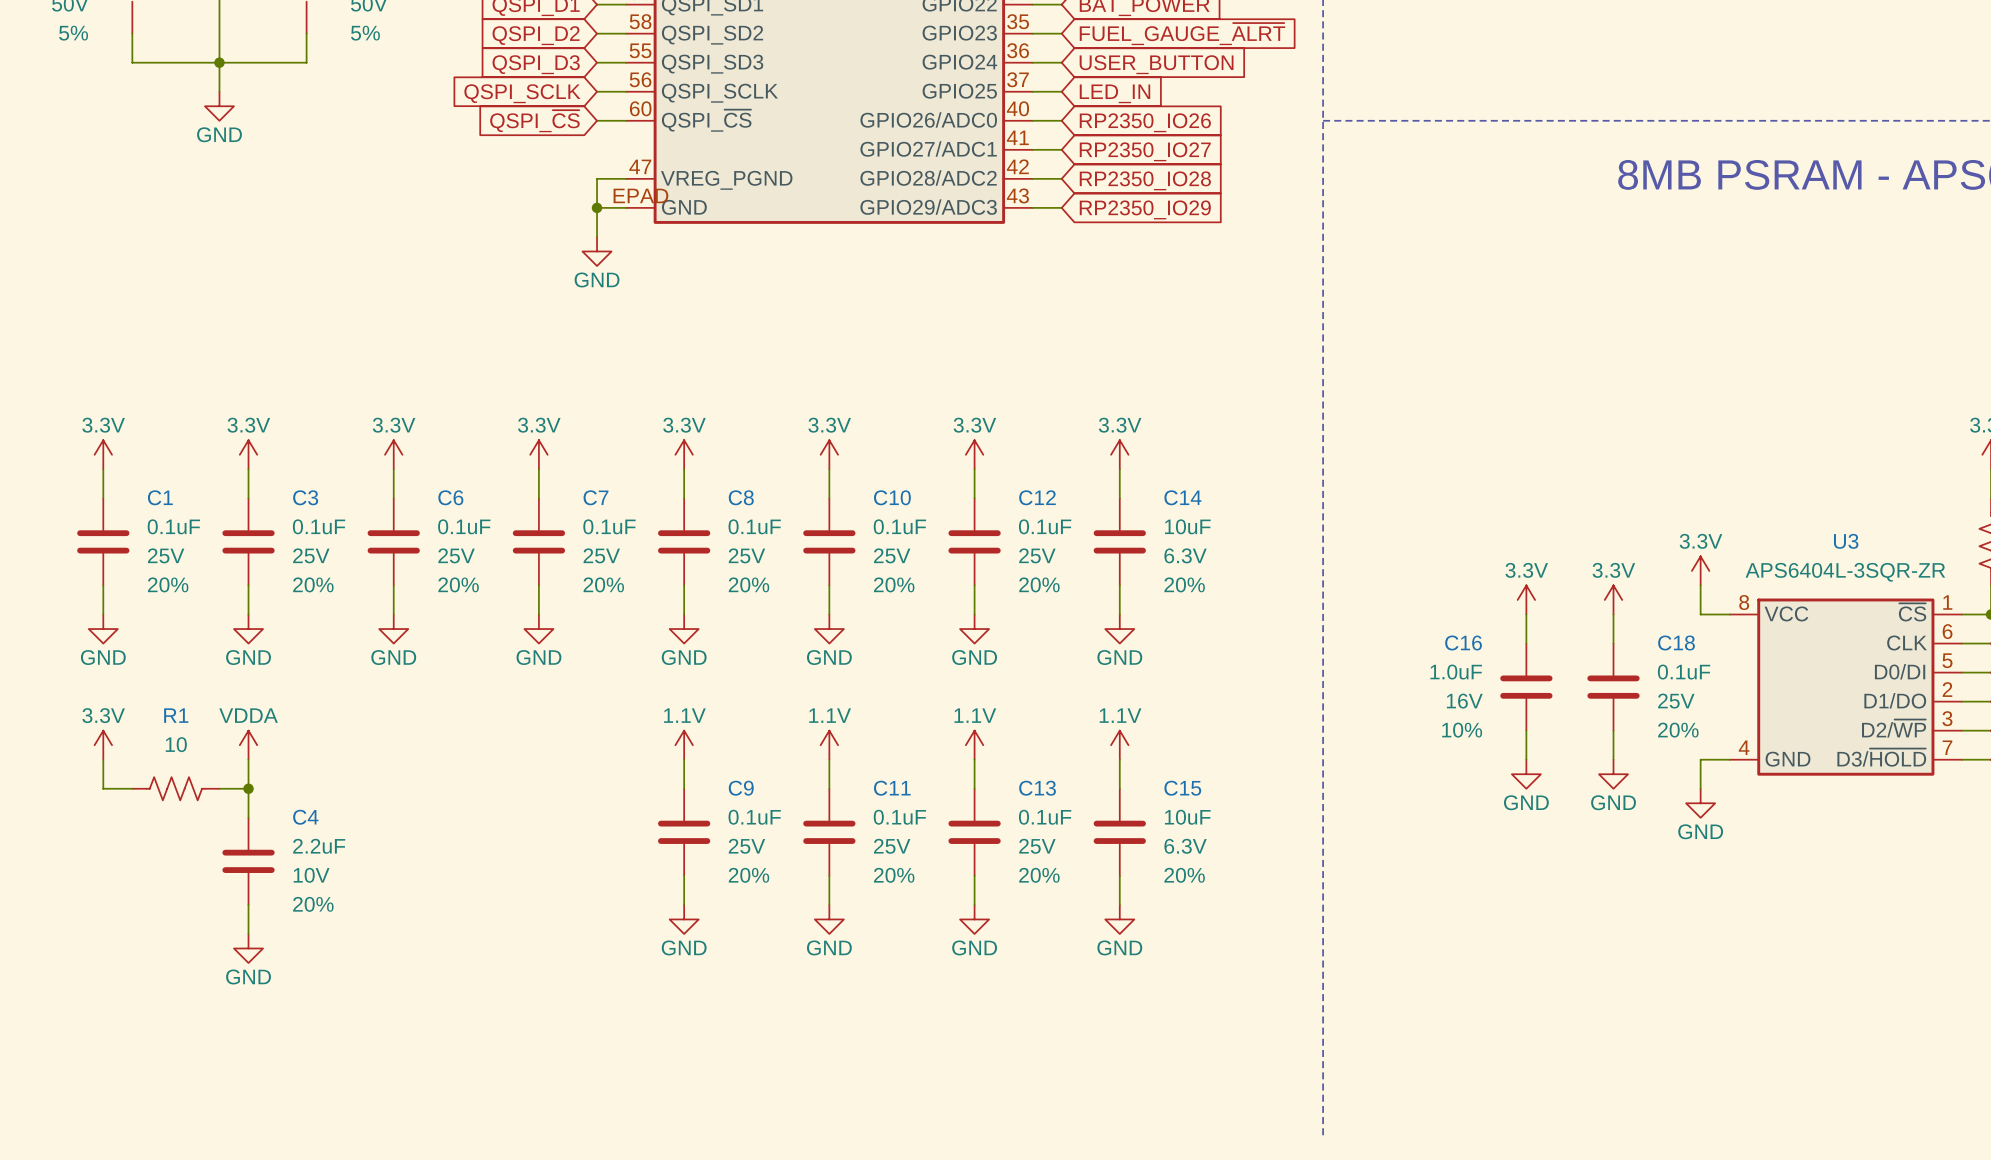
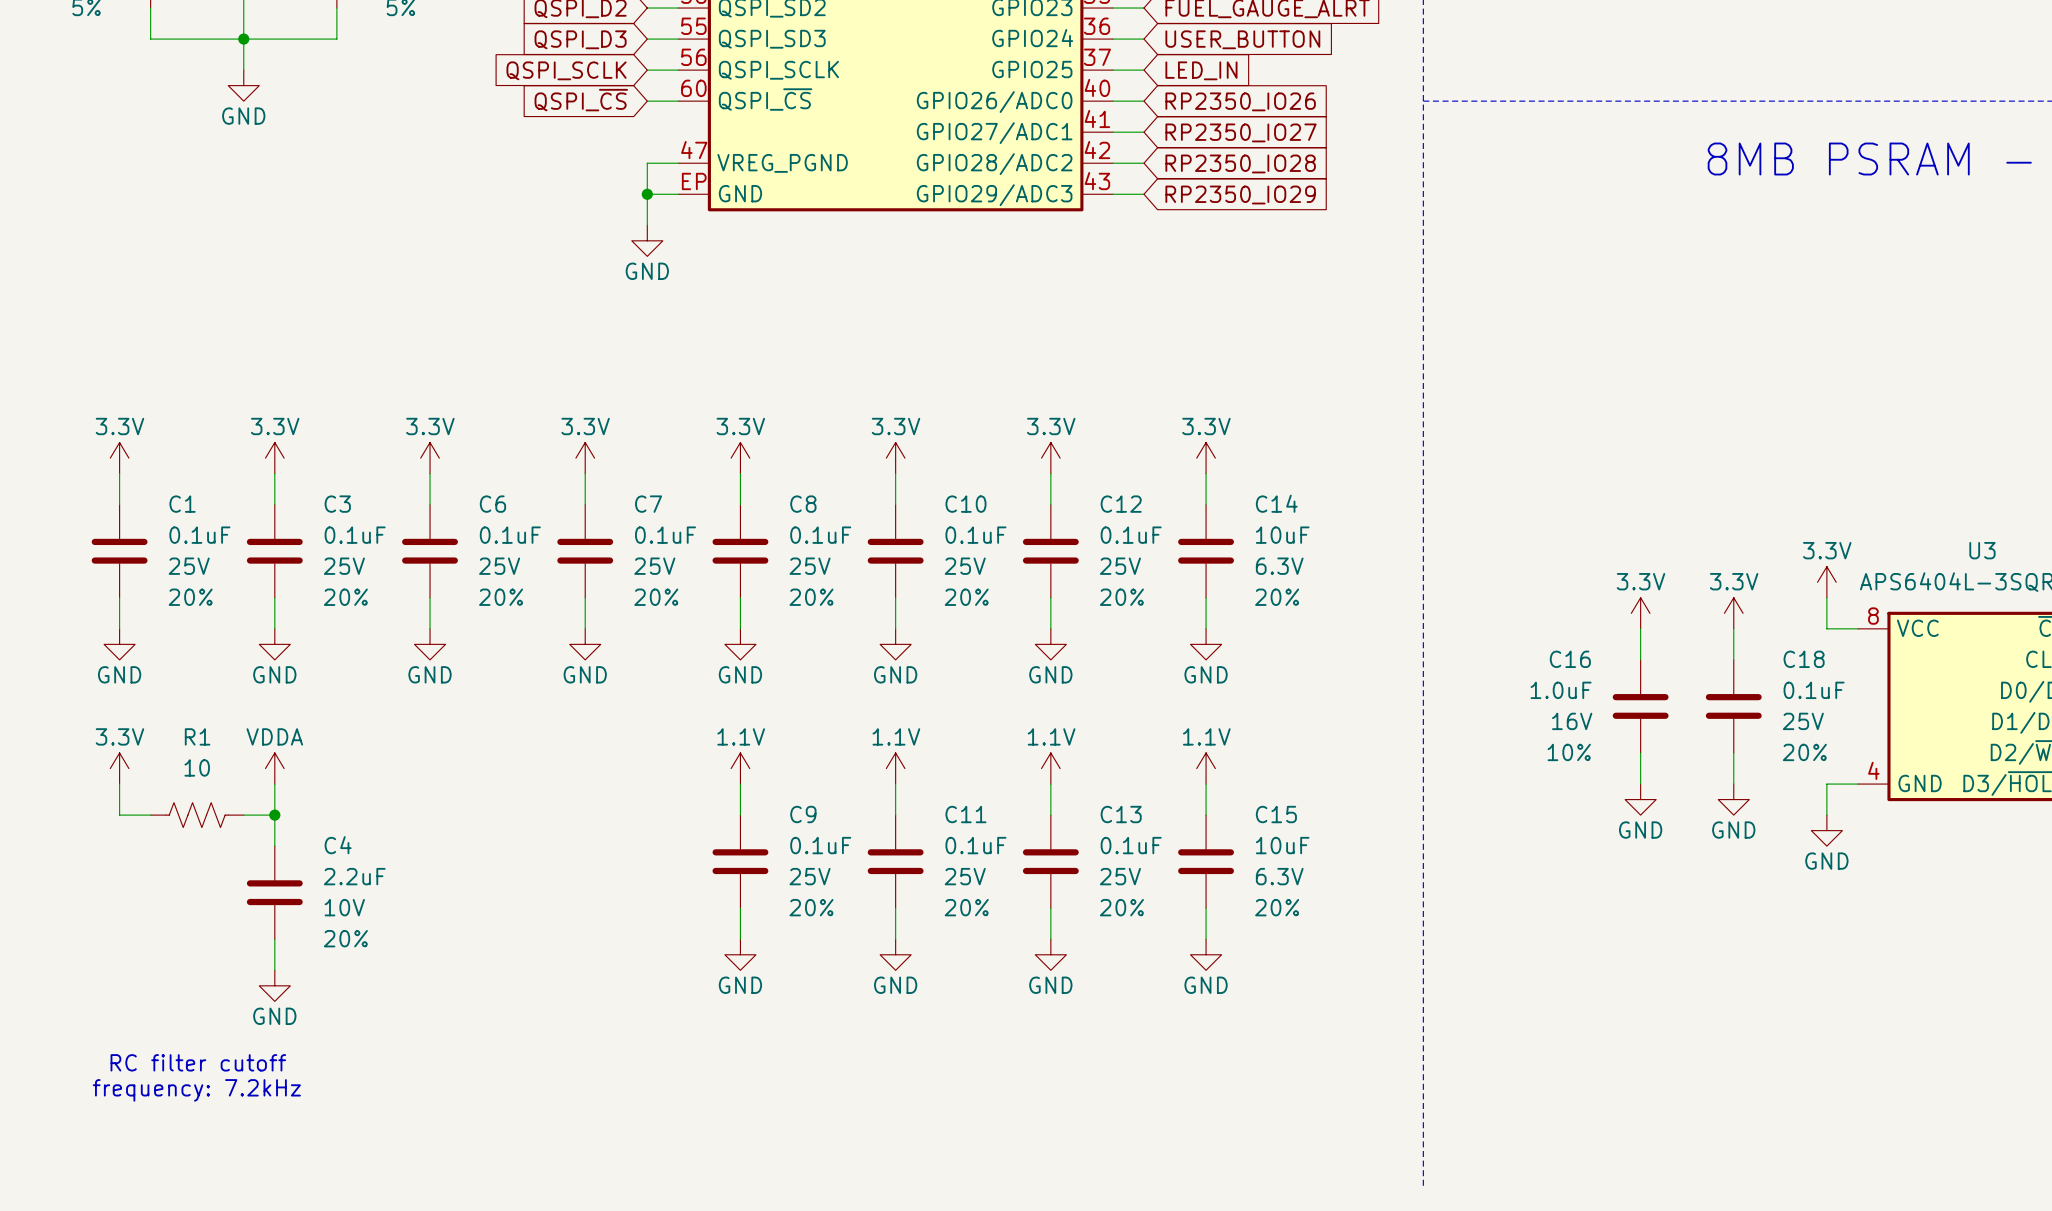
part pin number: EPAD (640, 195) -> EP (694, 181)
text: none -> RC filter cutoff (198, 1062)
text: none -> frequency: 7.2kHz (196, 1090)

